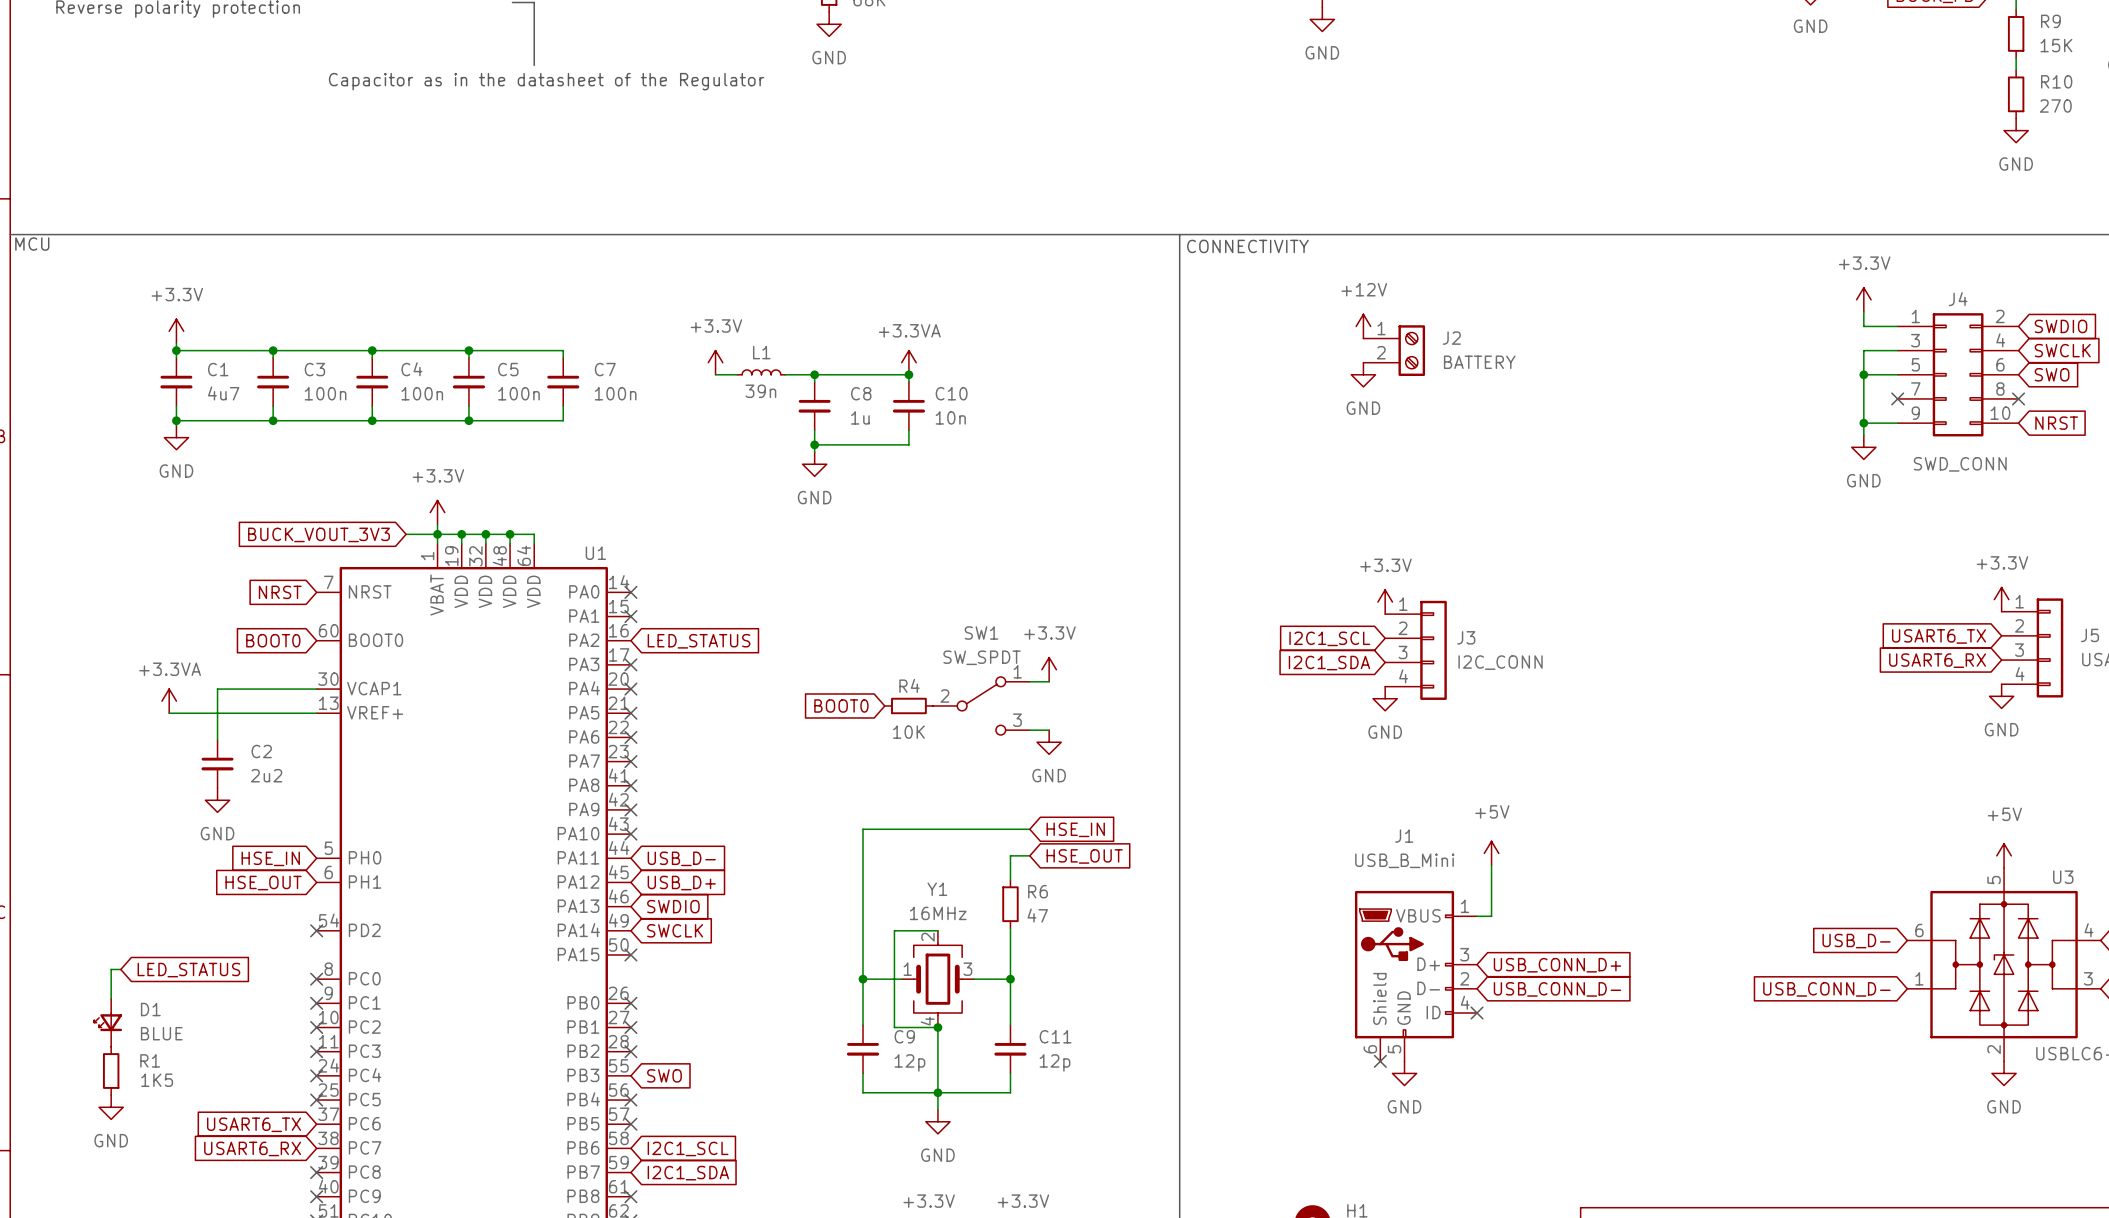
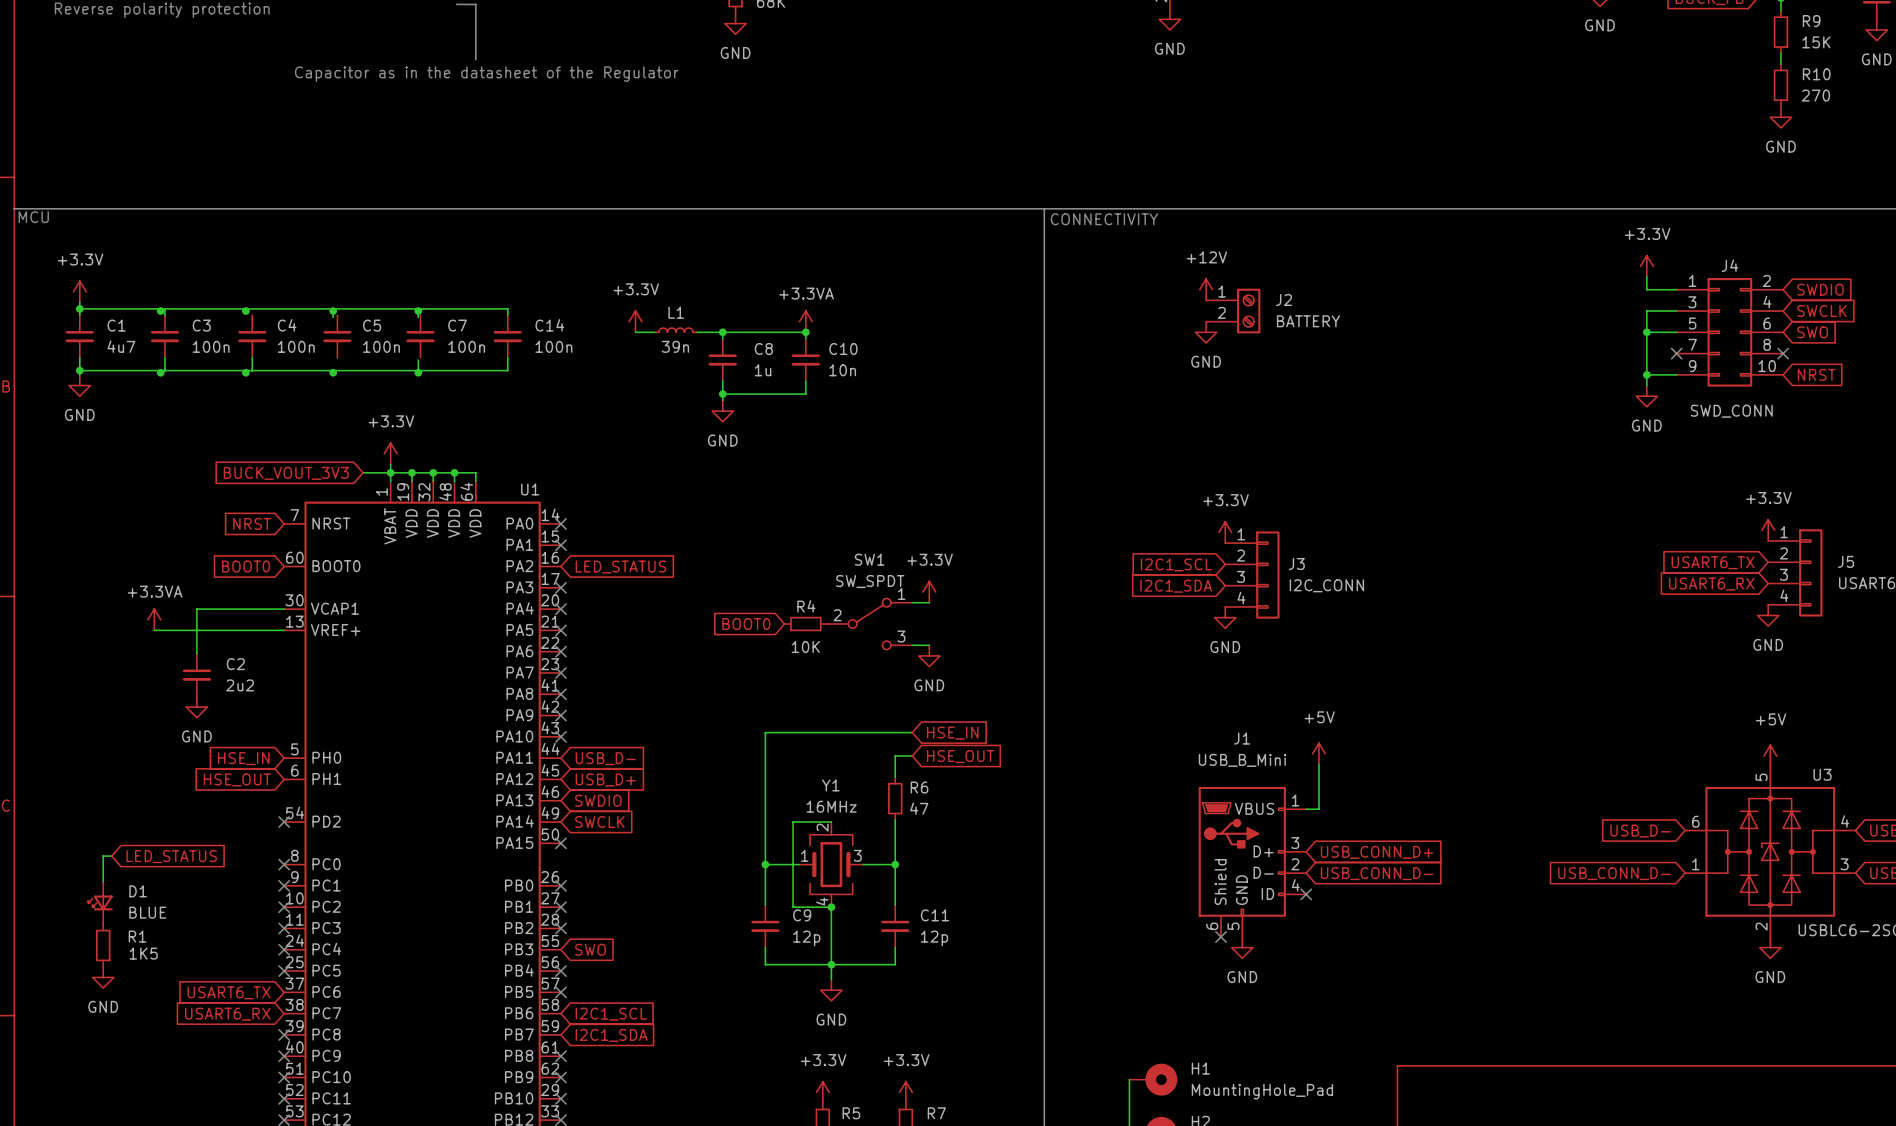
power symbol position: +3.3V (176, 331) -> +3.3V (79, 291)
wire: none -> (79, 308) (507, 308) (507, 315)
junction: none -> (79, 308)
wire: (176, 350) (563, 350) (563, 357) -> none
C14: none -> 100n (507, 336)
C1 position: (176, 382) -> (79, 336)
C3 position: (273, 382) -> (164, 336)
C4 position: (372, 382) -> (252, 336)
C5 position: (468, 382) -> (337, 336)
C7 position: (563, 382) -> (420, 336)
wire: none -> (507, 357) (507, 370) (79, 370)
wire: (176, 406) (176, 425) -> (79, 357) (79, 374)
wire: (273, 406) (273, 420) -> (164, 357) (164, 370)
wire: (372, 406) (372, 420) -> (252, 357) (252, 370)
wire: (563, 406) (563, 420) (176, 420) -> none
junction: none -> (79, 370)
power symbol position: GND (176, 437) -> GND (79, 385)

